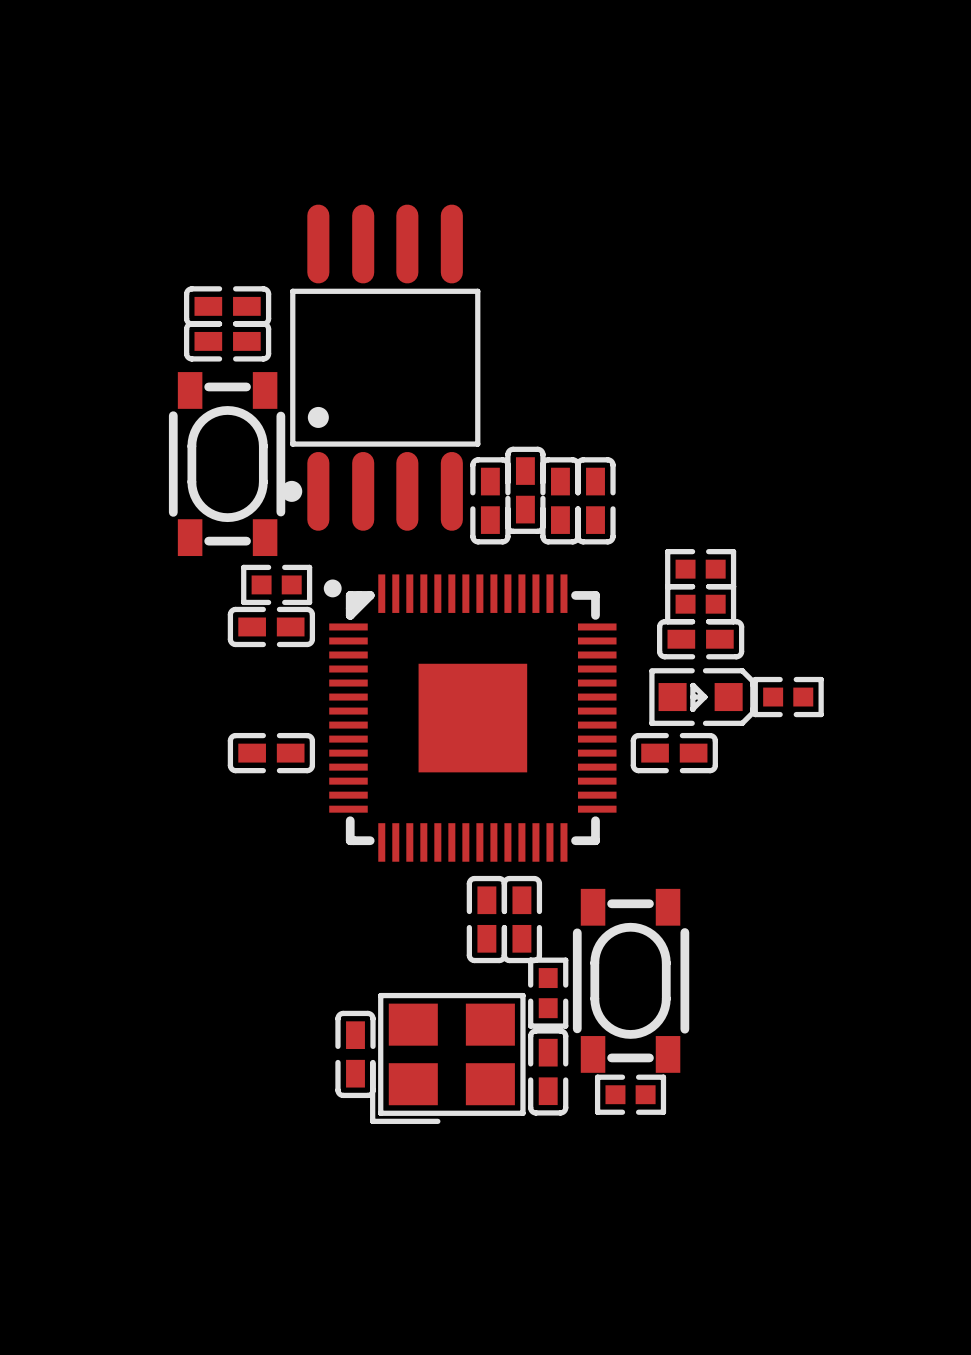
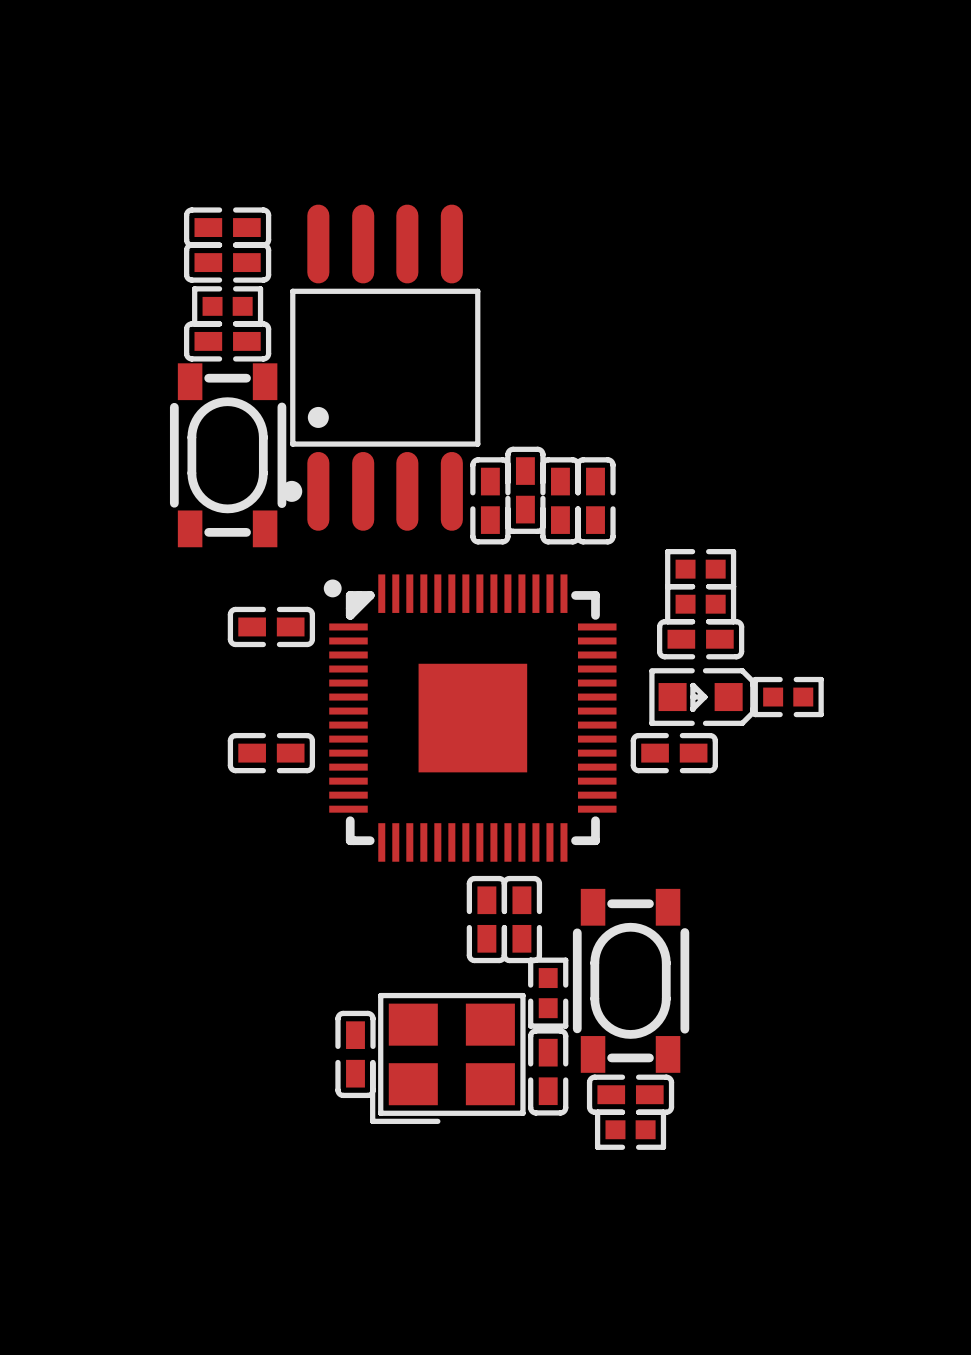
part: none -> (227, 227)
part: none -> (227, 262)
part footprint: [183, 286, 272, 327] -> [192, 286, 264, 327]
part footprint: [168, 372, 286, 557] -> [169, 363, 287, 548]
part position: (276, 584) -> (630, 1129)
part footprint: [594, 1074, 667, 1115] -> [586, 1074, 675, 1115]

